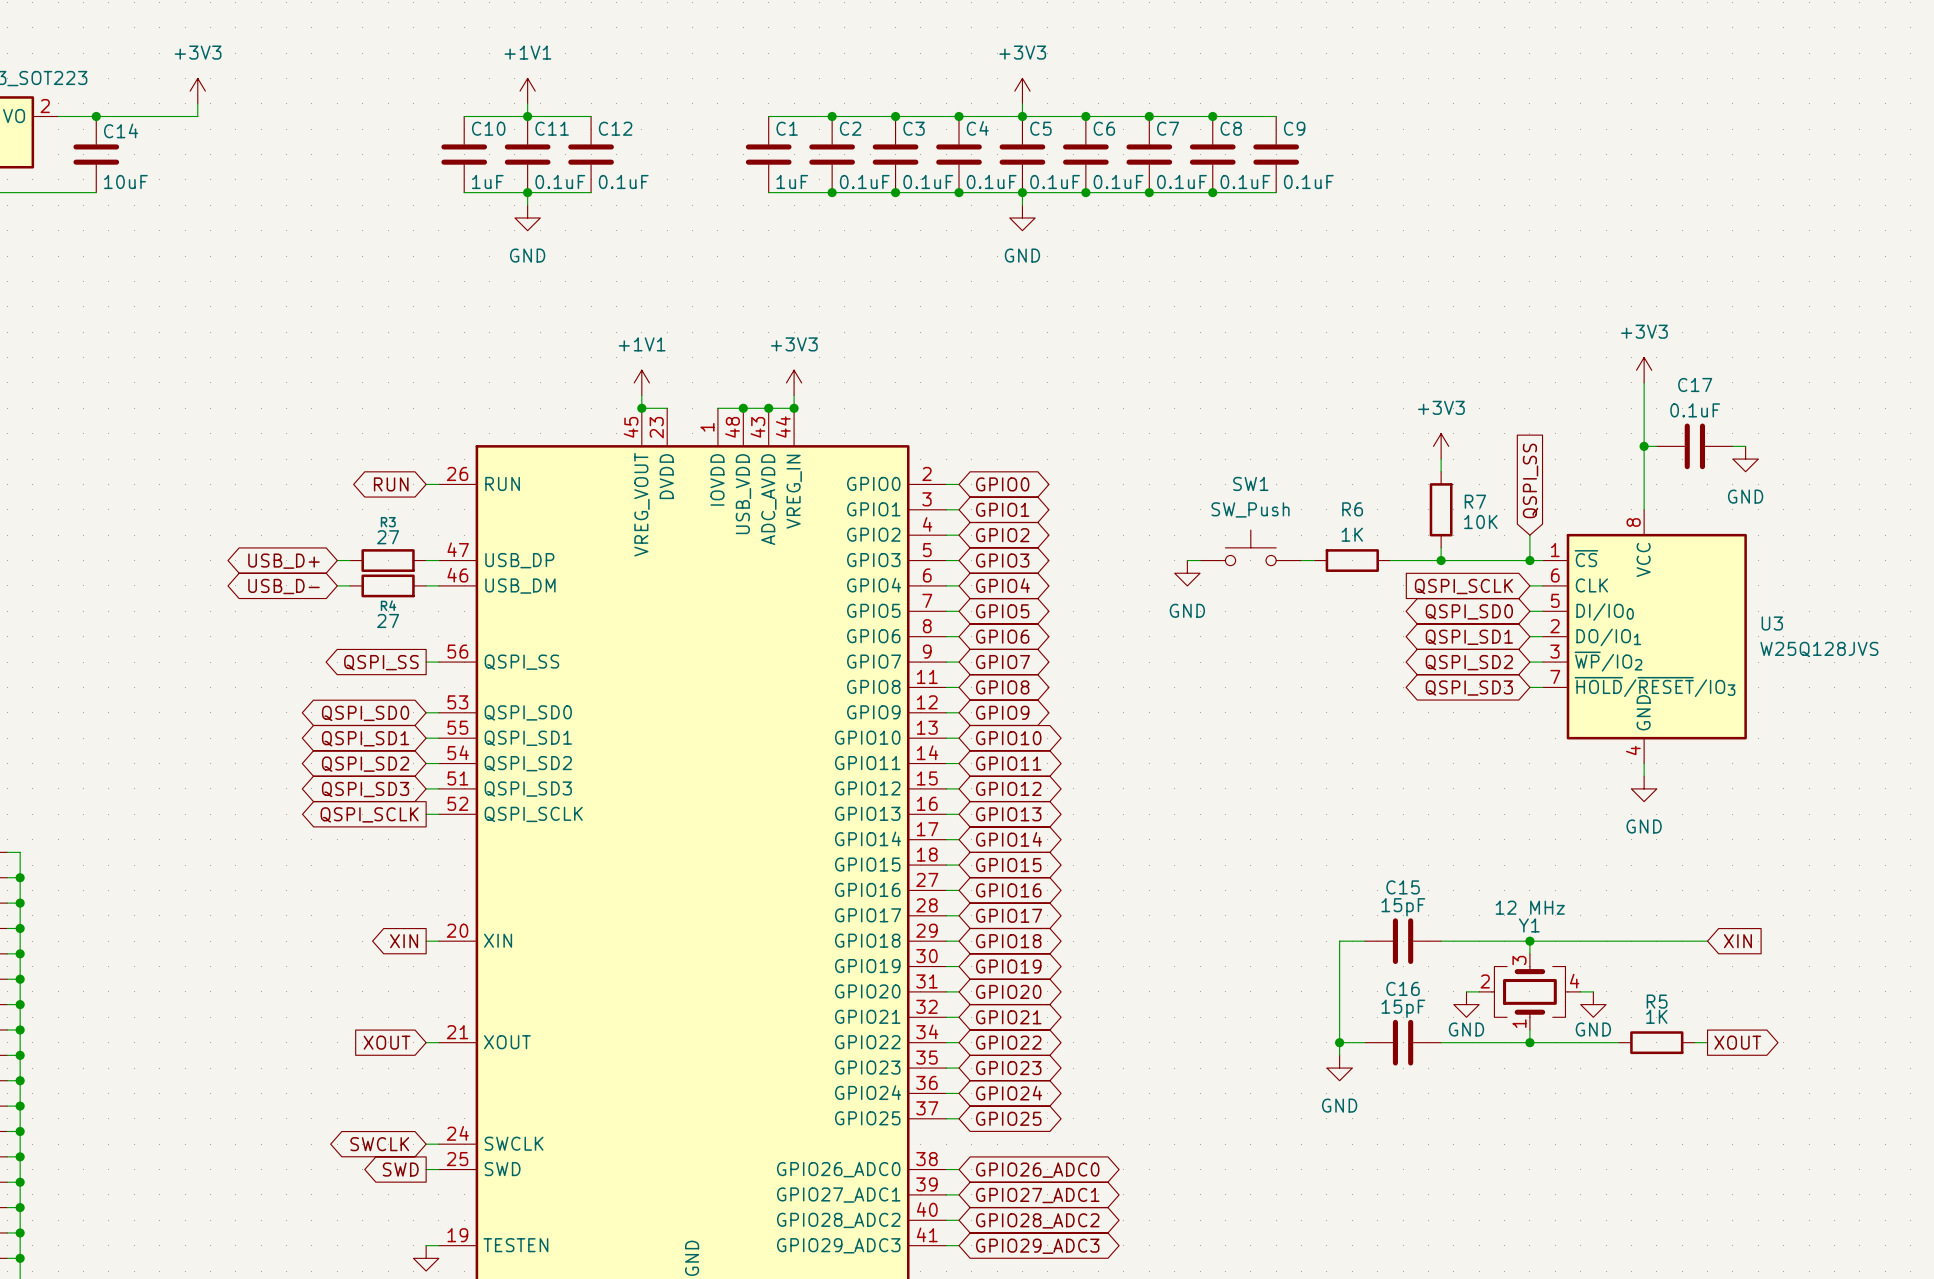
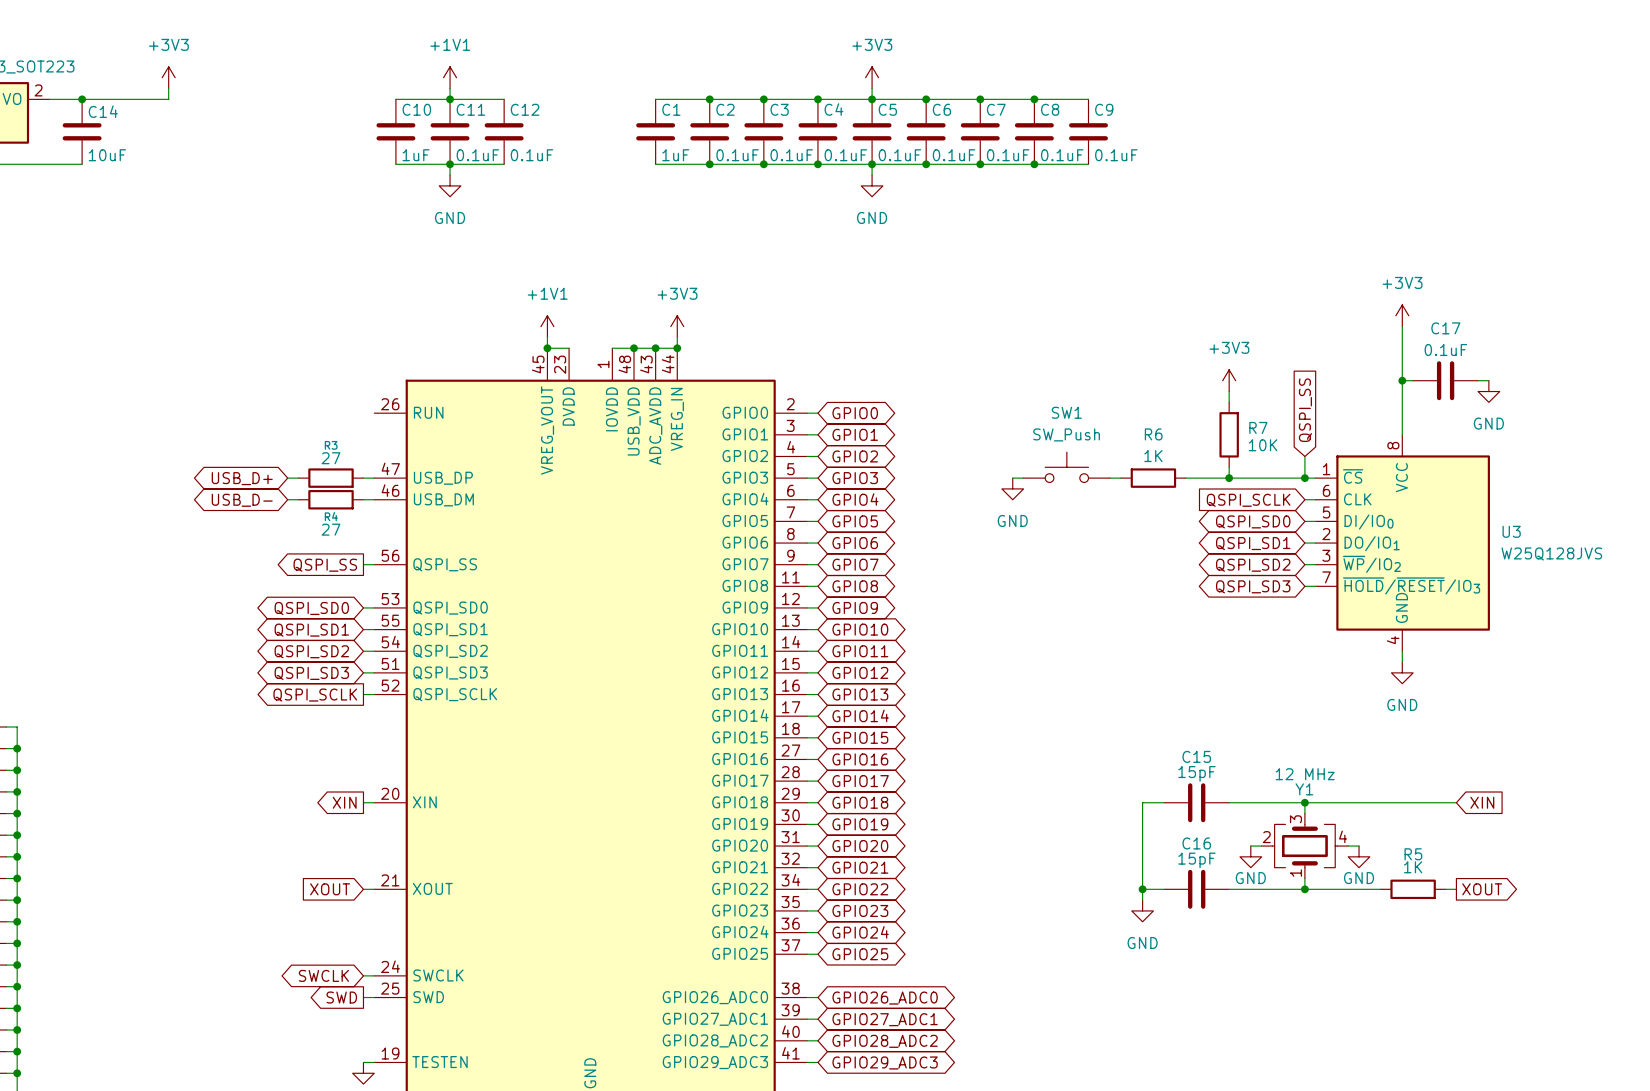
global label: RUN (391, 484) -> none
wire: (426, 484) (438, 484) -> none

